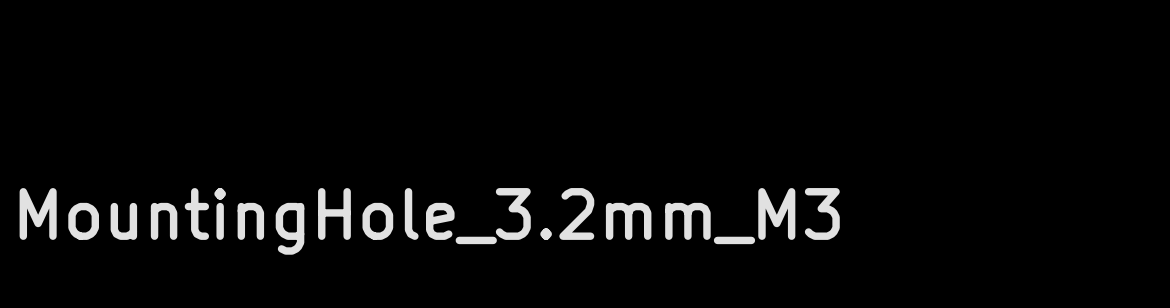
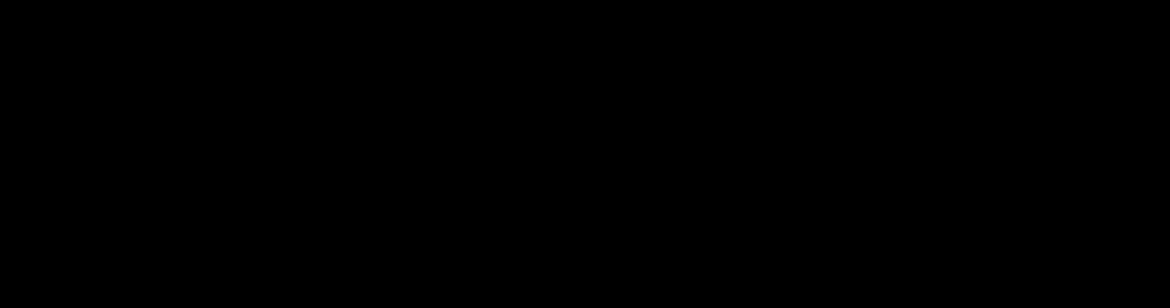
text: MountingHole_3.2mm_M3 (429, 221) -> none

